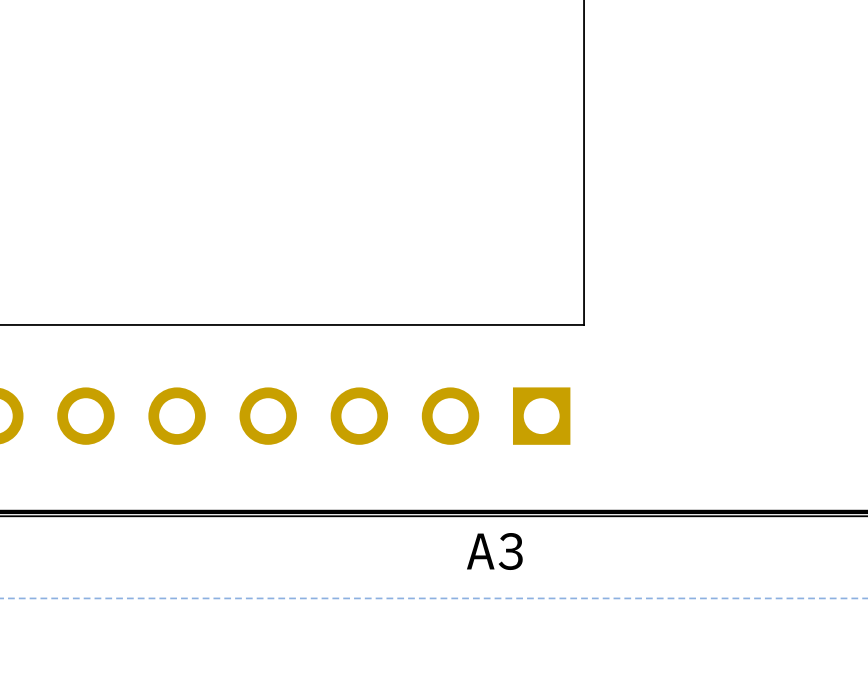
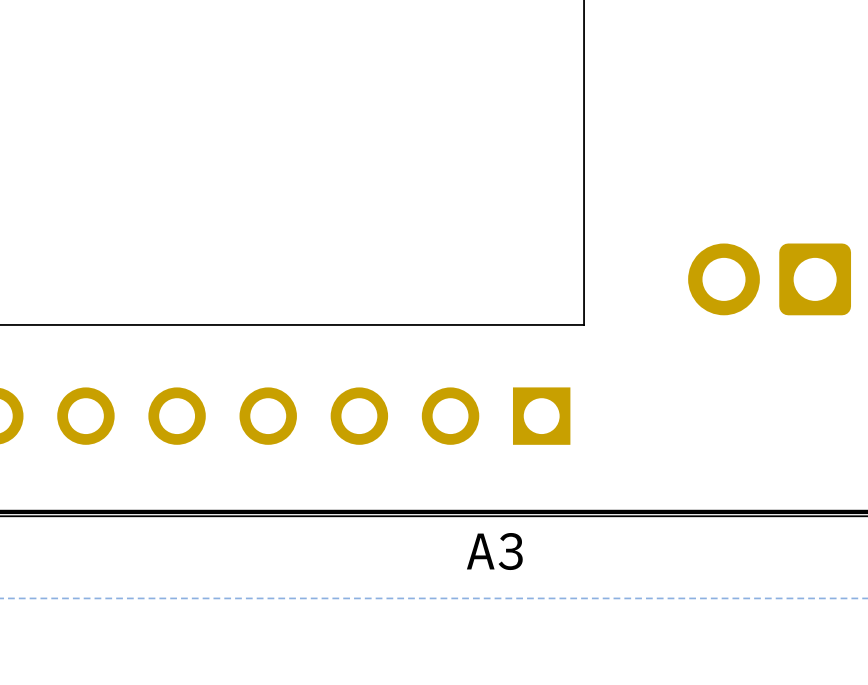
part: none -> (769, 279)

